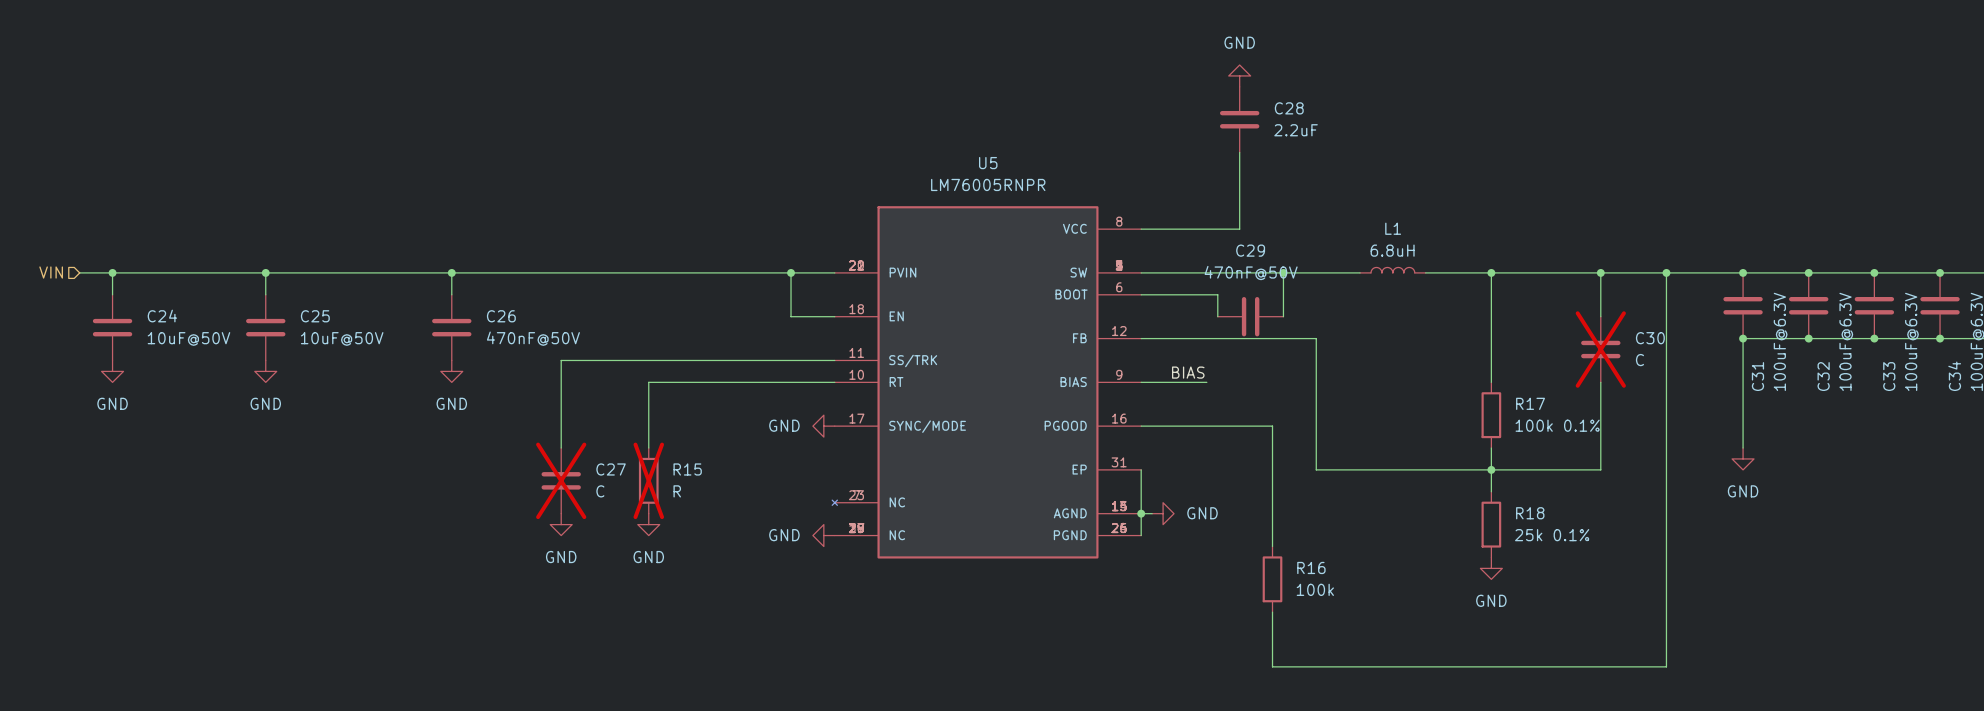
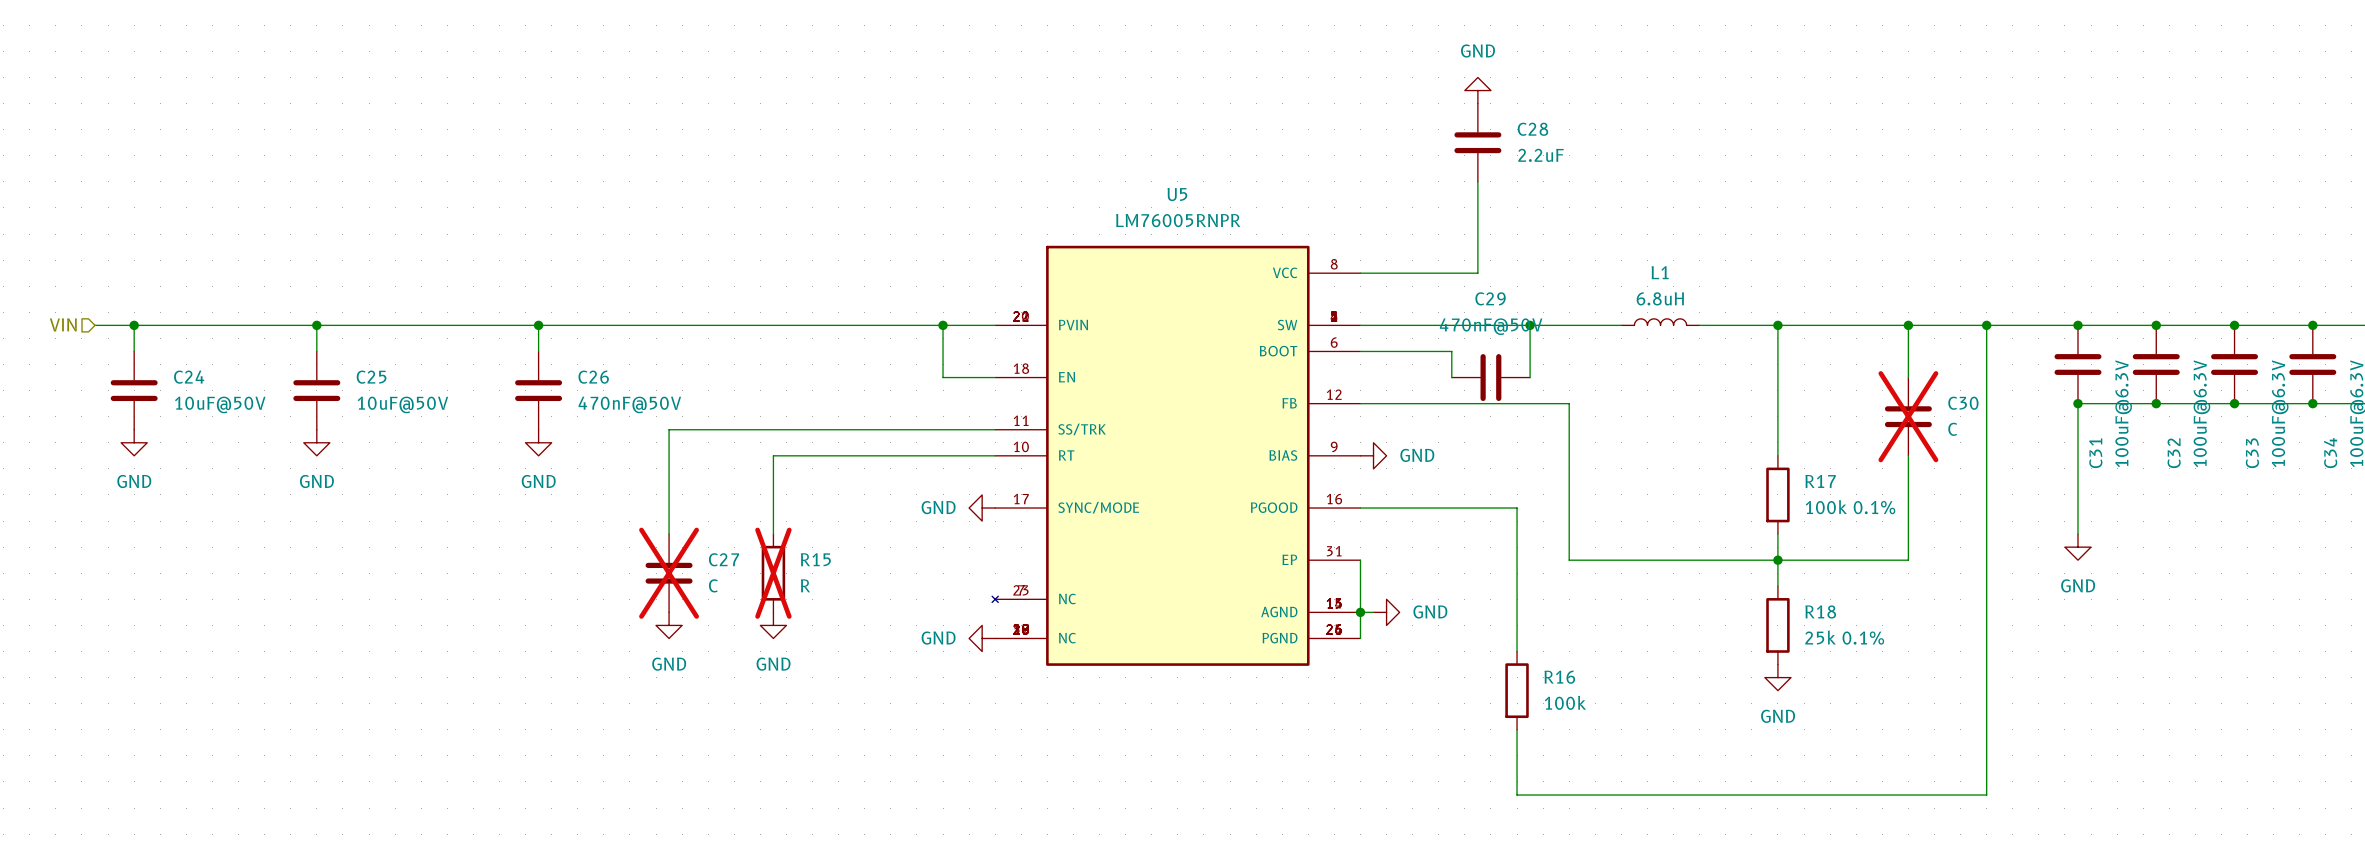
label: BIAS (1188, 372) -> none
wire: (1141, 382) (1206, 382) -> none
power symbol: none -> GND (1373, 455)

